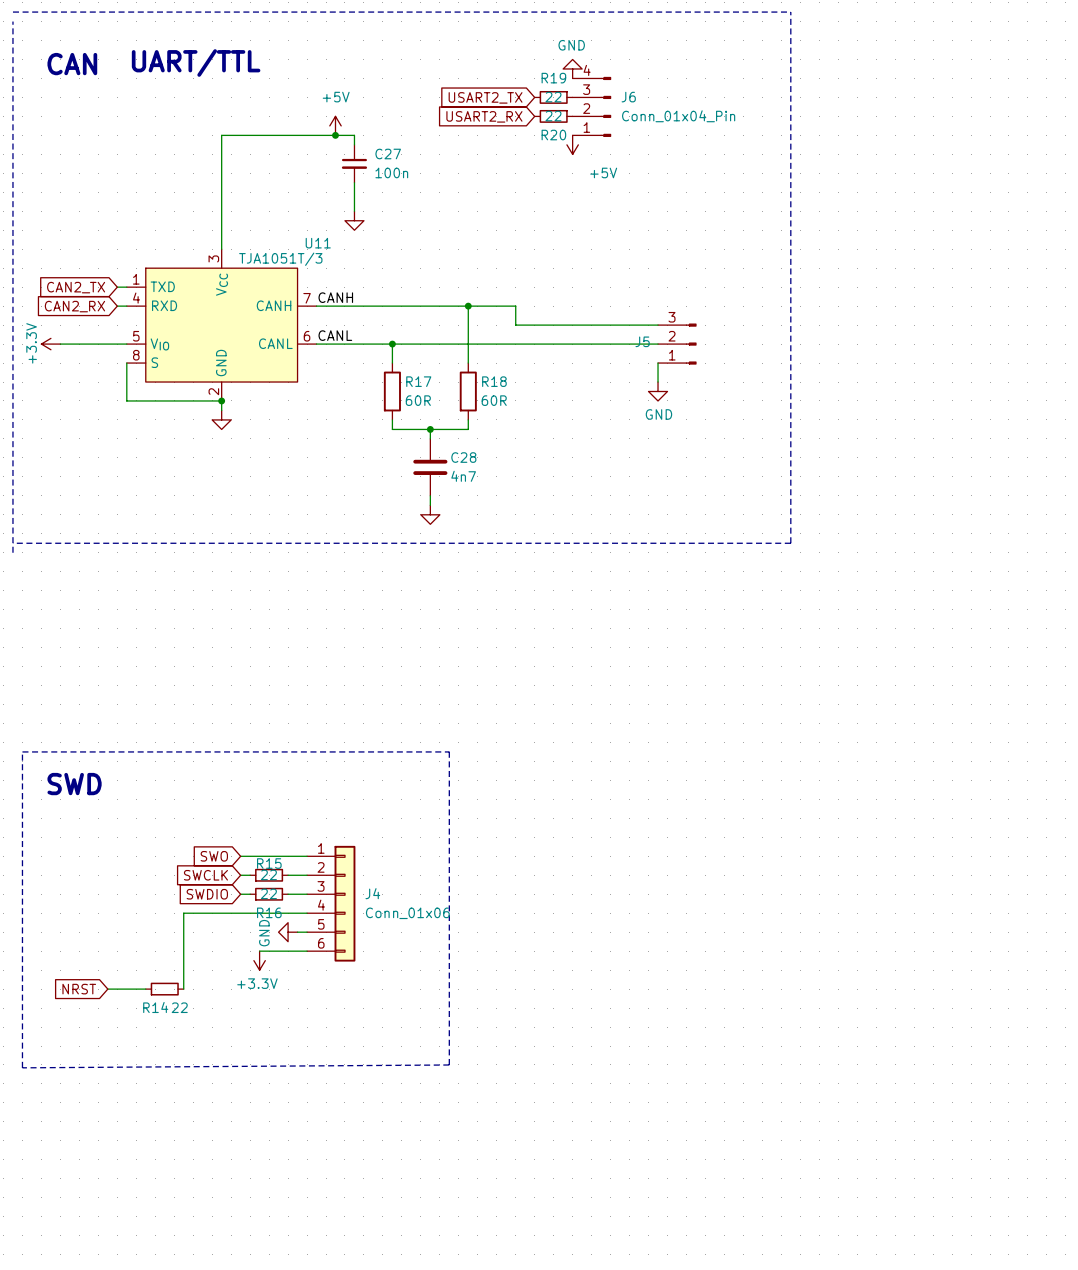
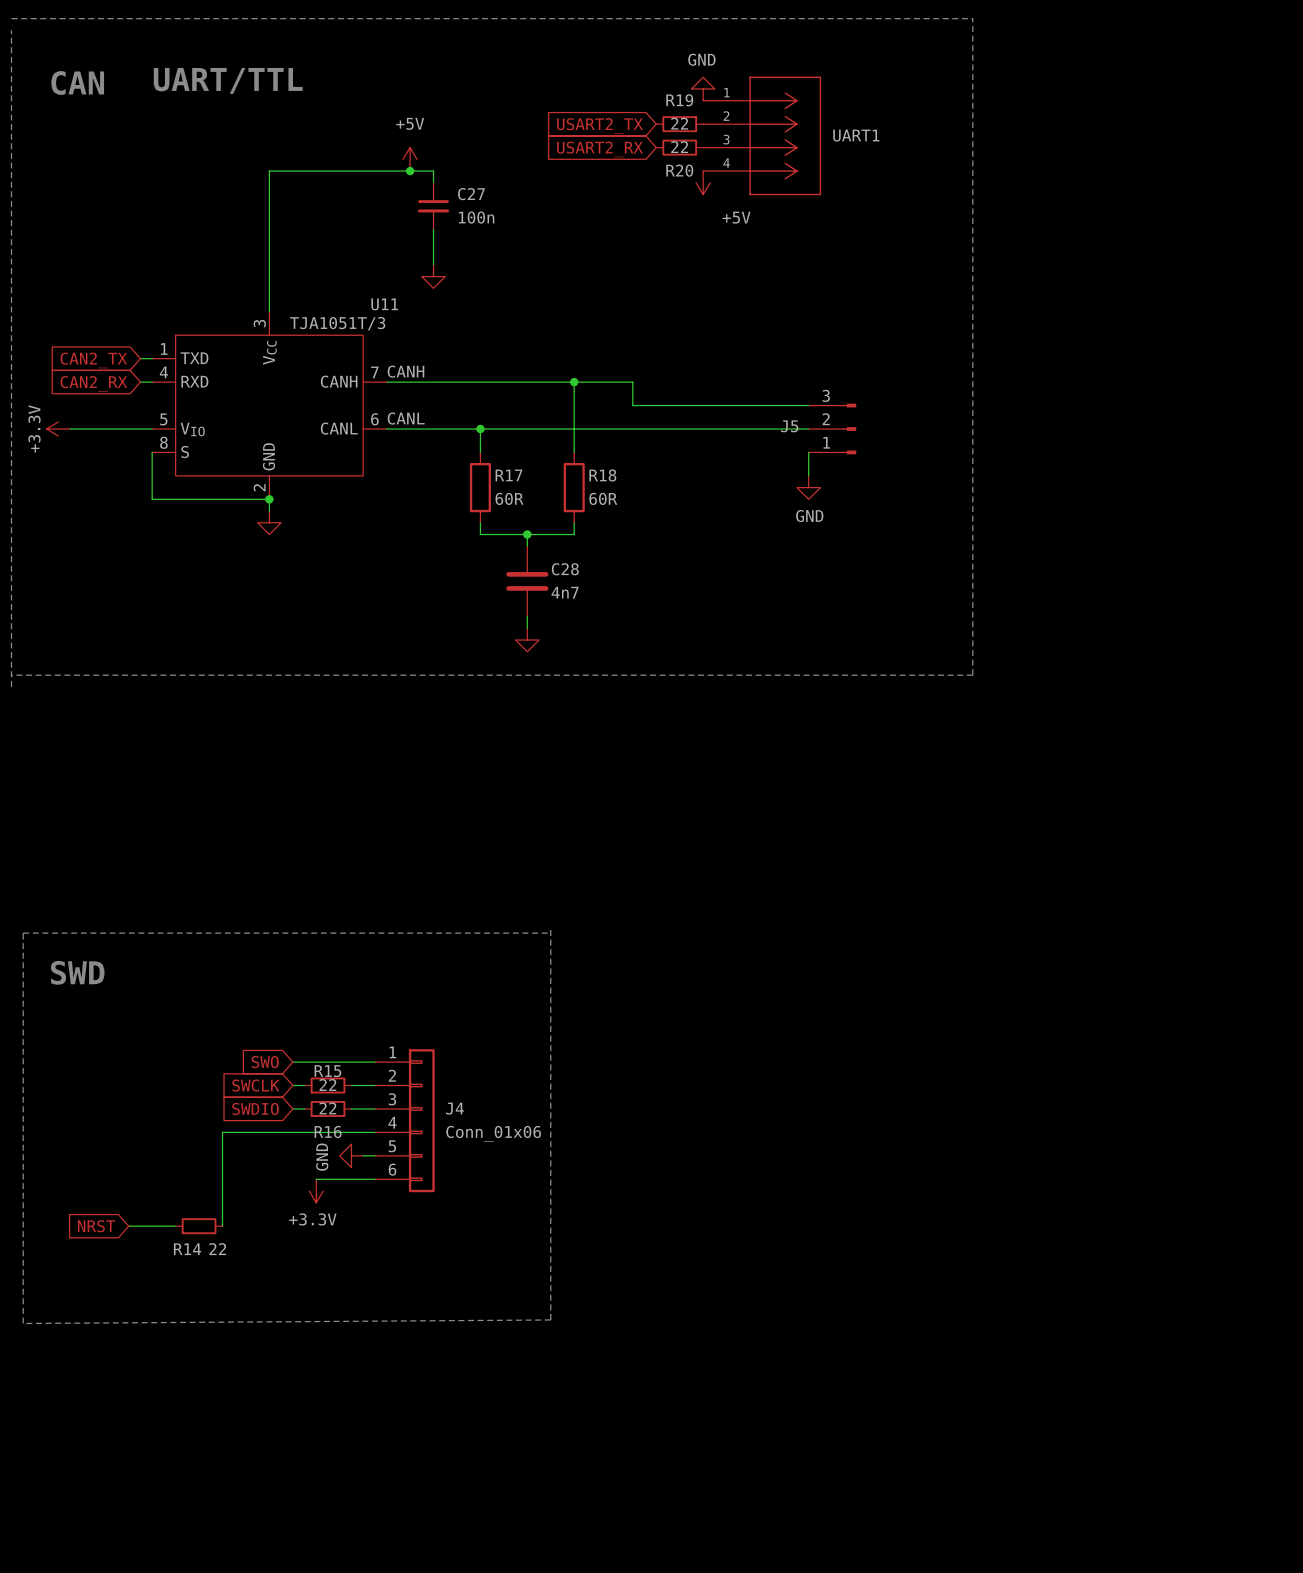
J6: Conn_01x04_Pin (591, 106) -> none
UART1: none -> (762, 135)

